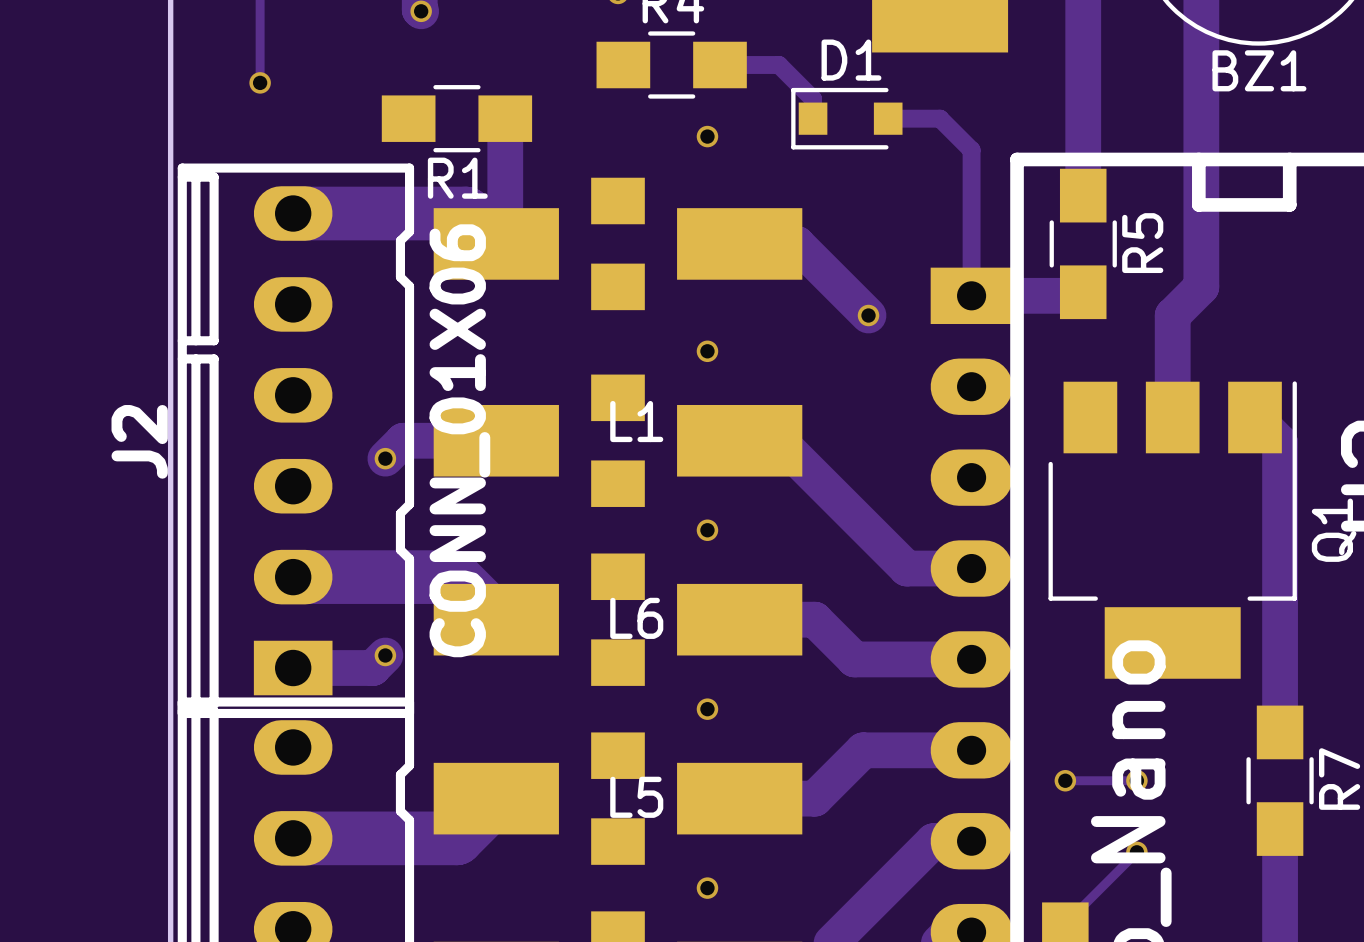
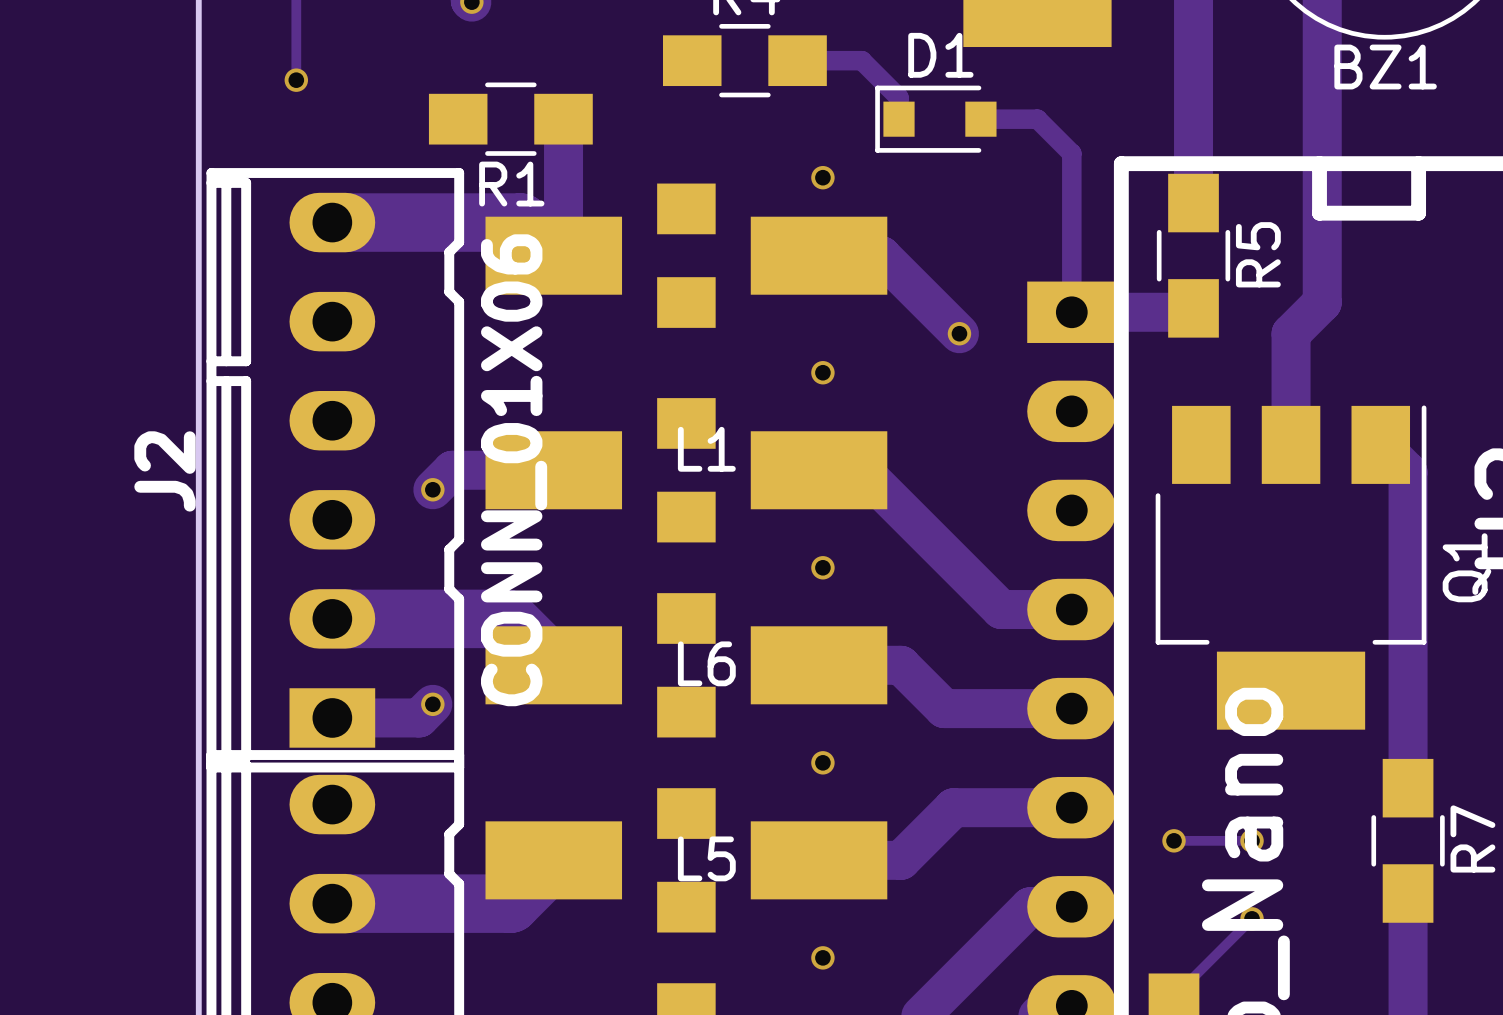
via position: (707, 136) -> (822, 177)
via position: (707, 351) -> (822, 372)
via position: (707, 530) -> (822, 567)
via position: (707, 709) -> (822, 762)
via position: (707, 888) -> (822, 957)

